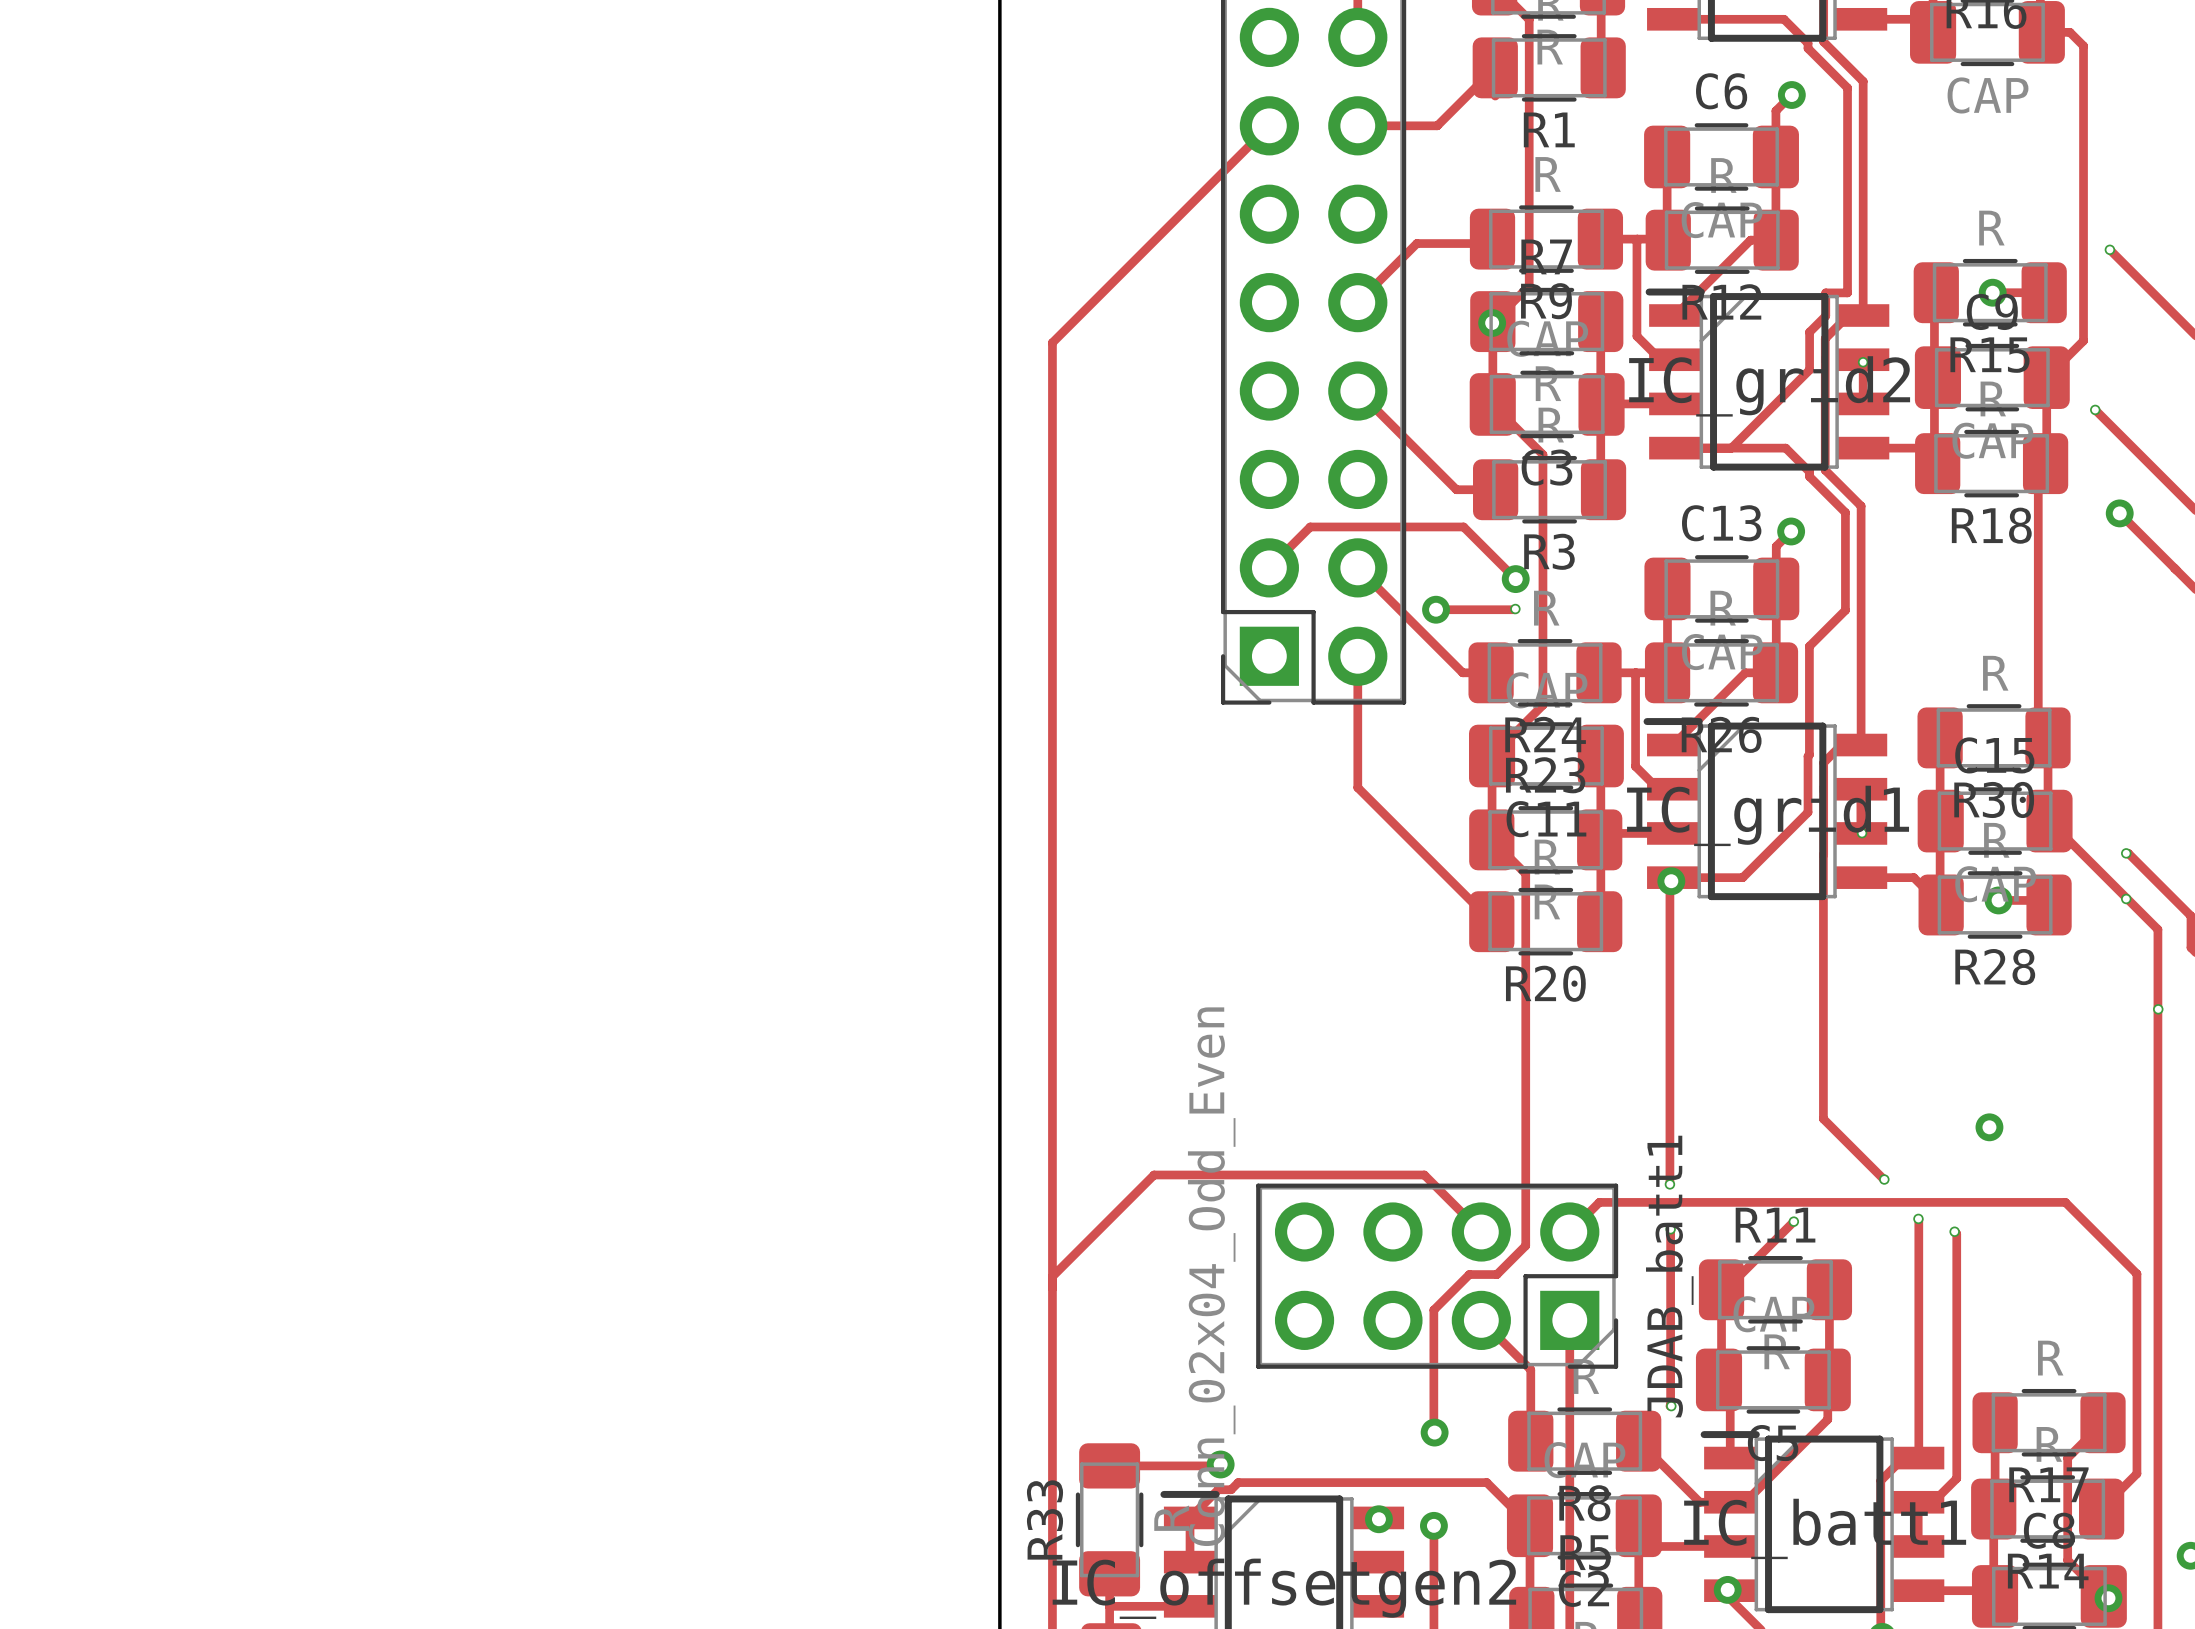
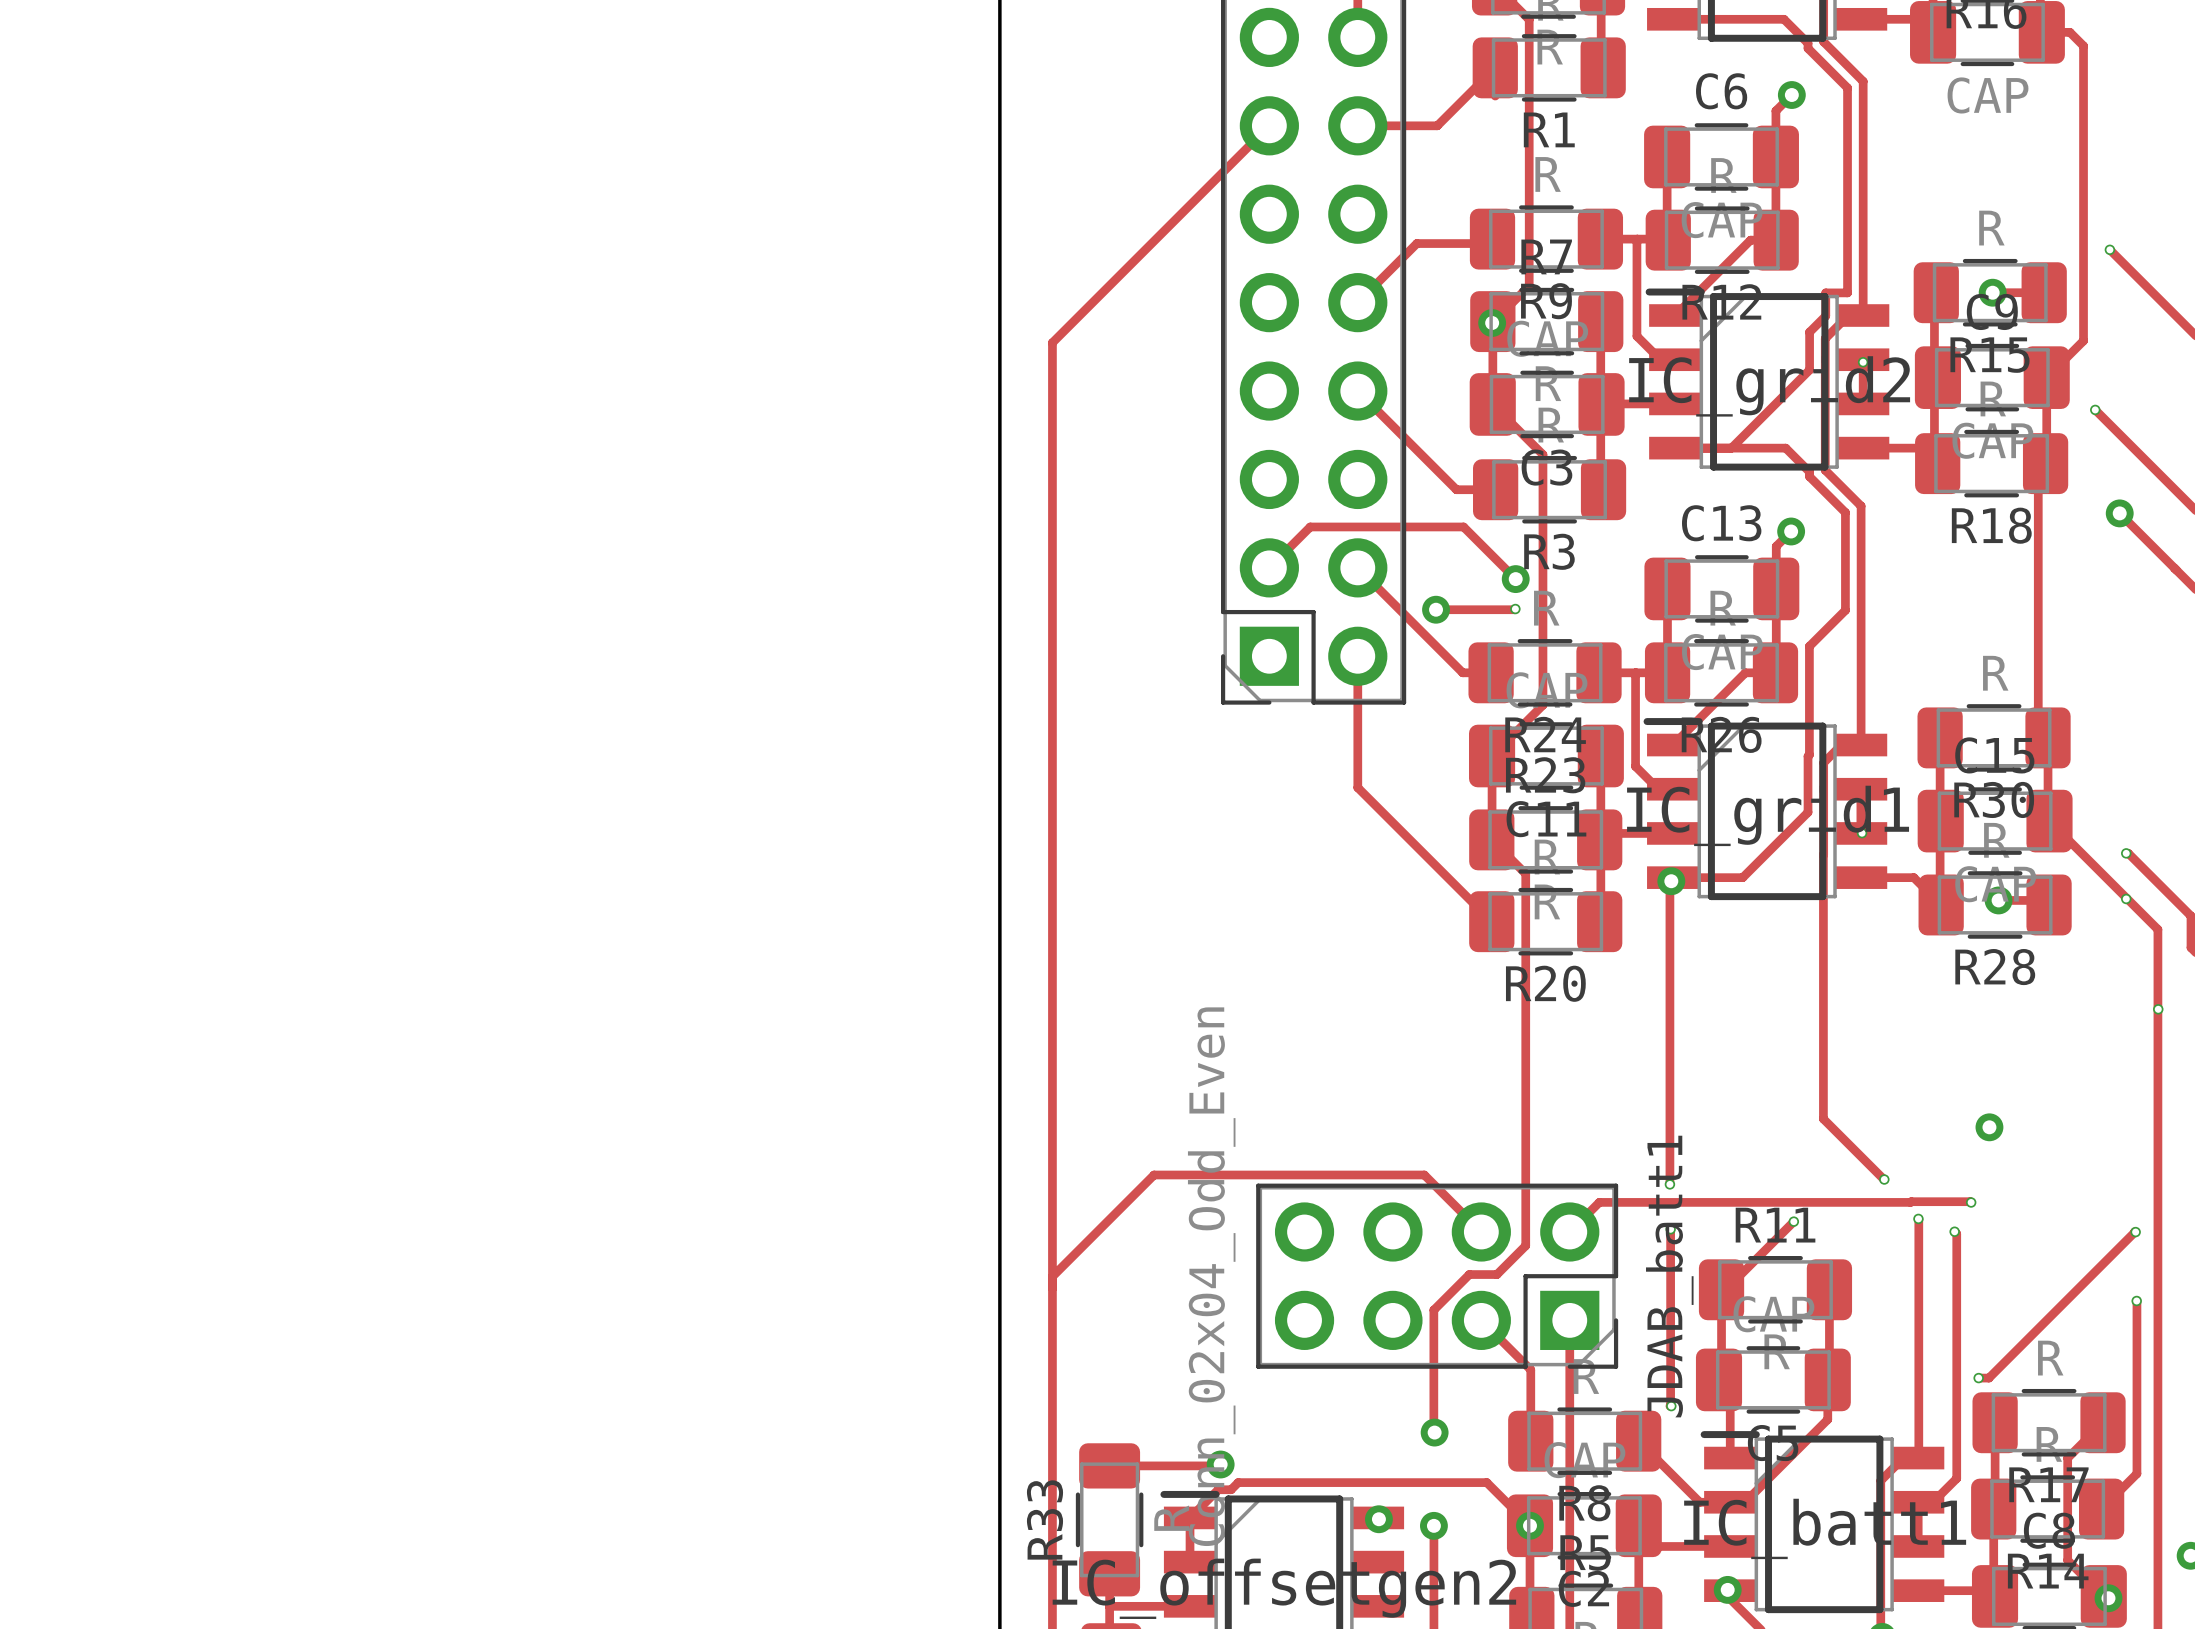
track: (1910, 1202) (2065, 1202) (2136, 1273) (2136, 1300) -> (1910, 1202) (1971, 1202)
via: none -> (1971, 1202)
track: none -> (2134, 1232) (1988, 1378) (1978, 1378)
via: none -> (2135, 1232)
via: none -> (2136, 1300)
via: none -> (1978, 1378)
via: none -> (1530, 1525)

